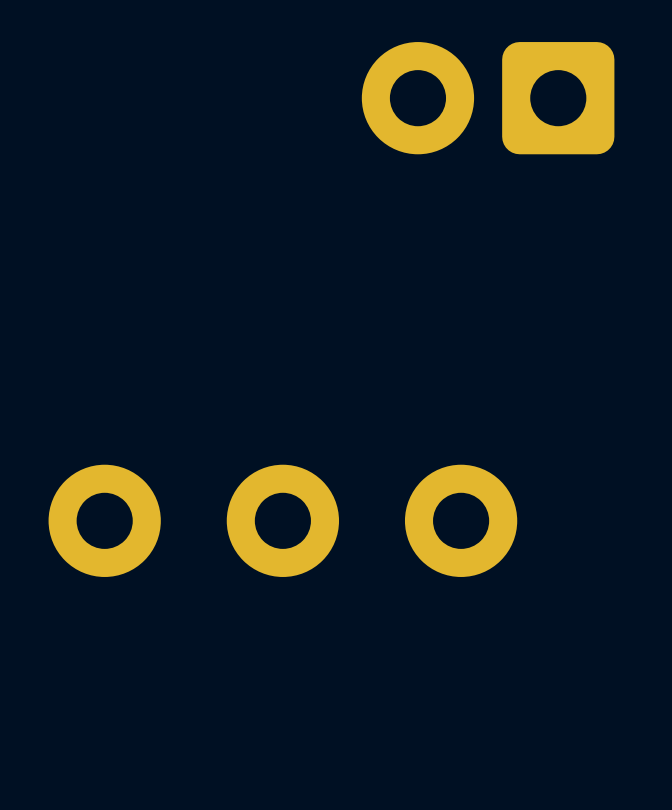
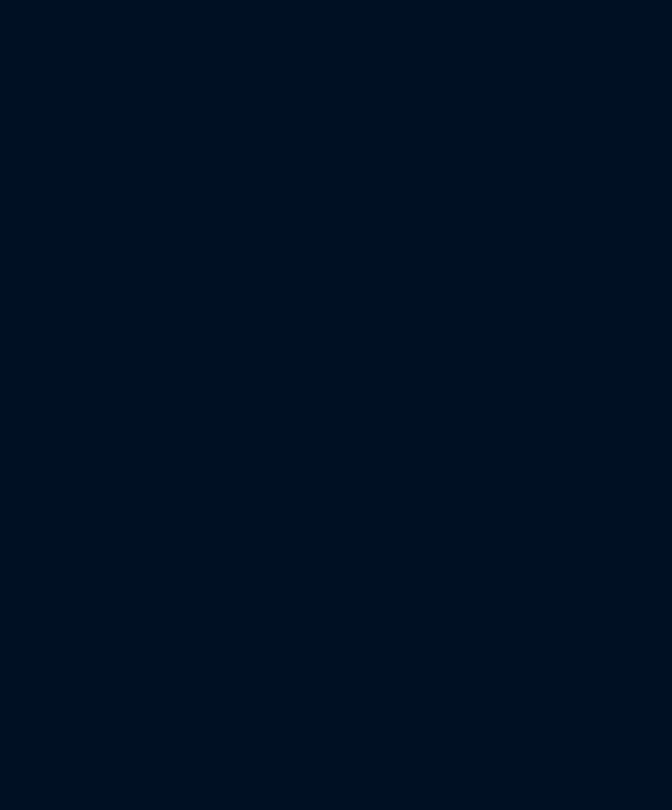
part: (488, 98) -> none
part: (282, 520) -> none

